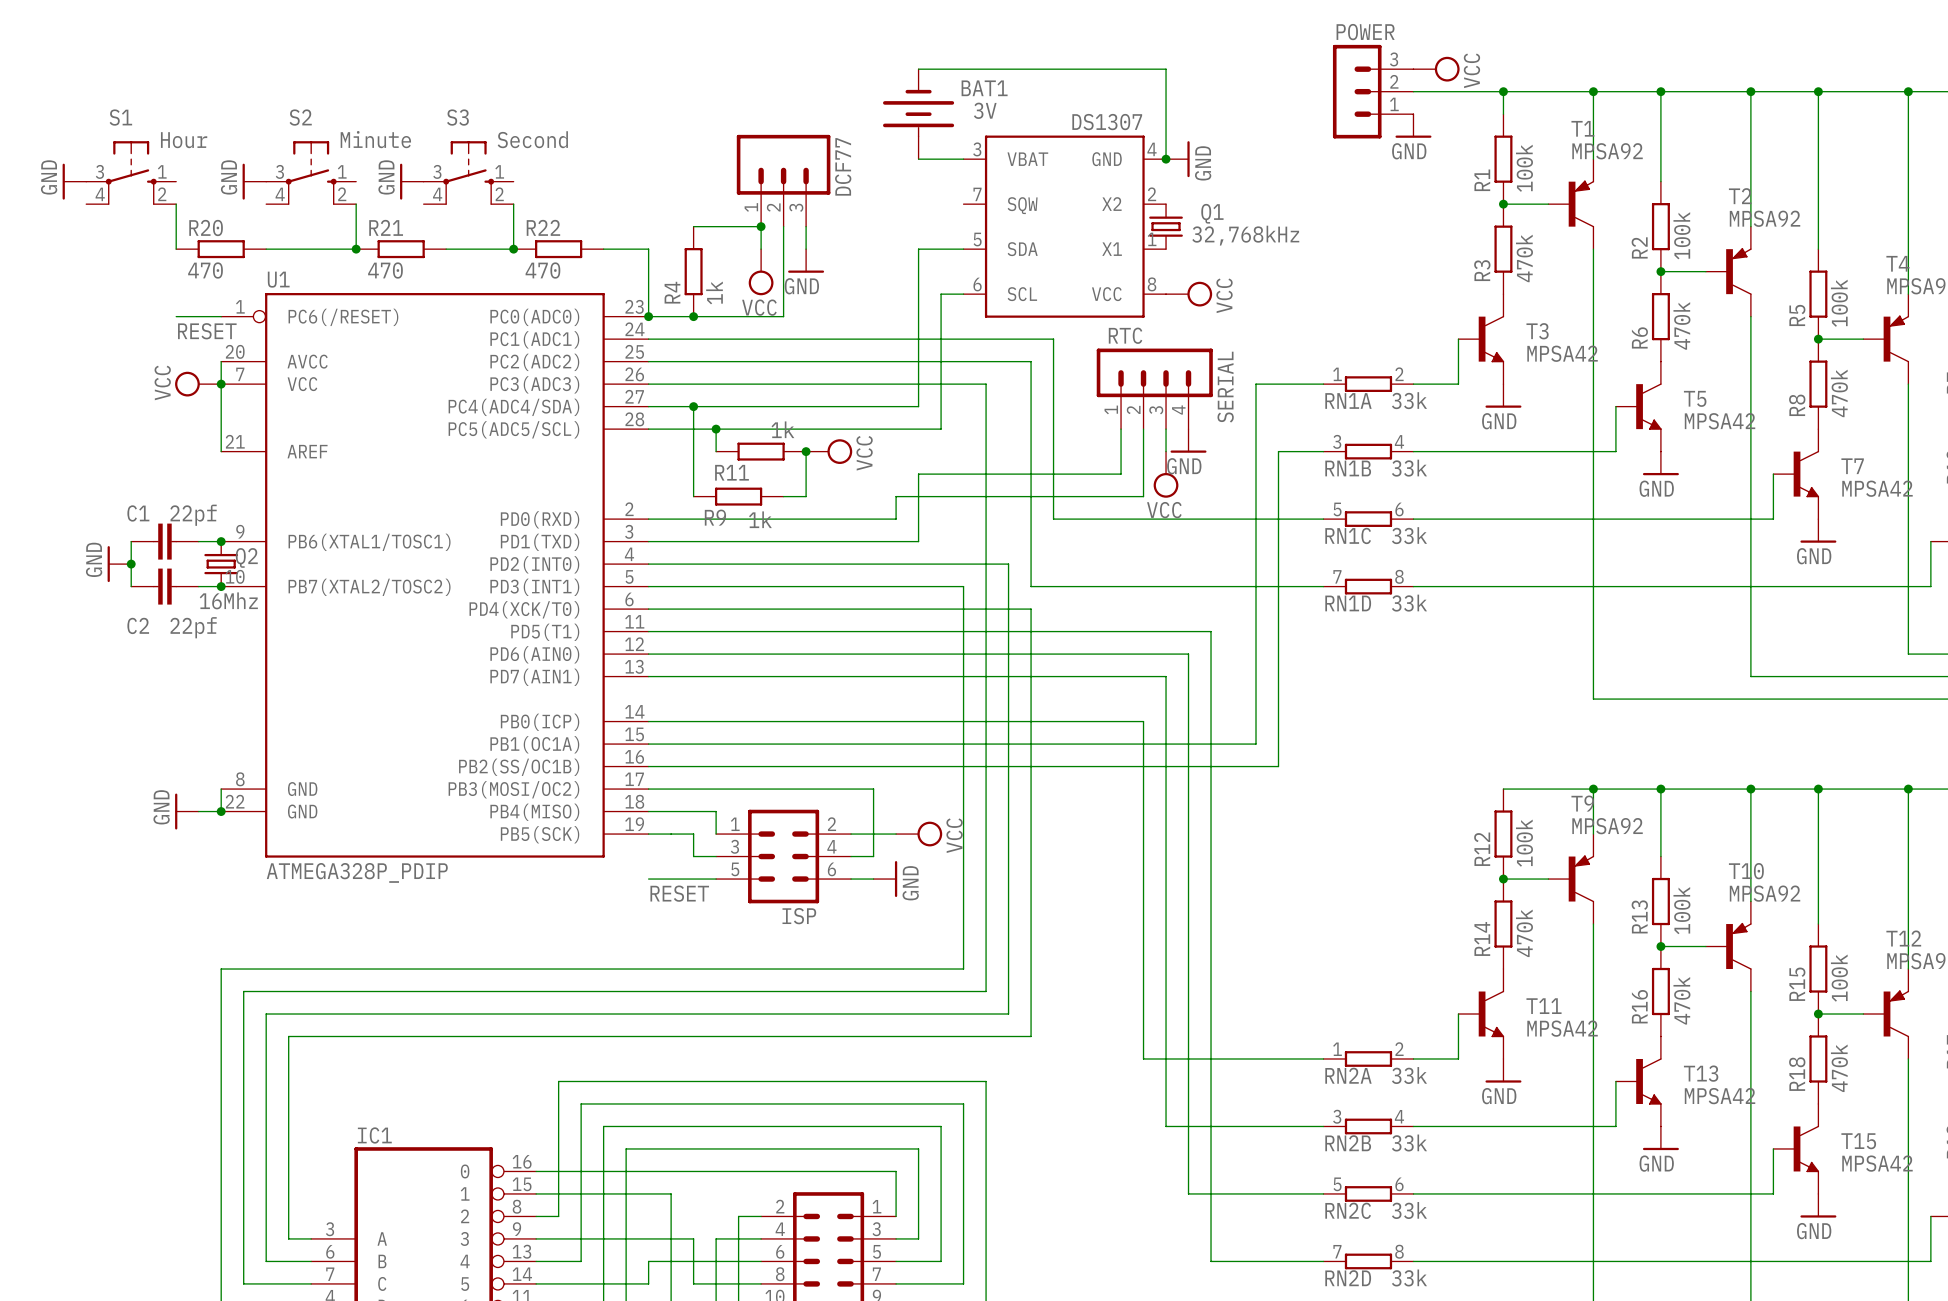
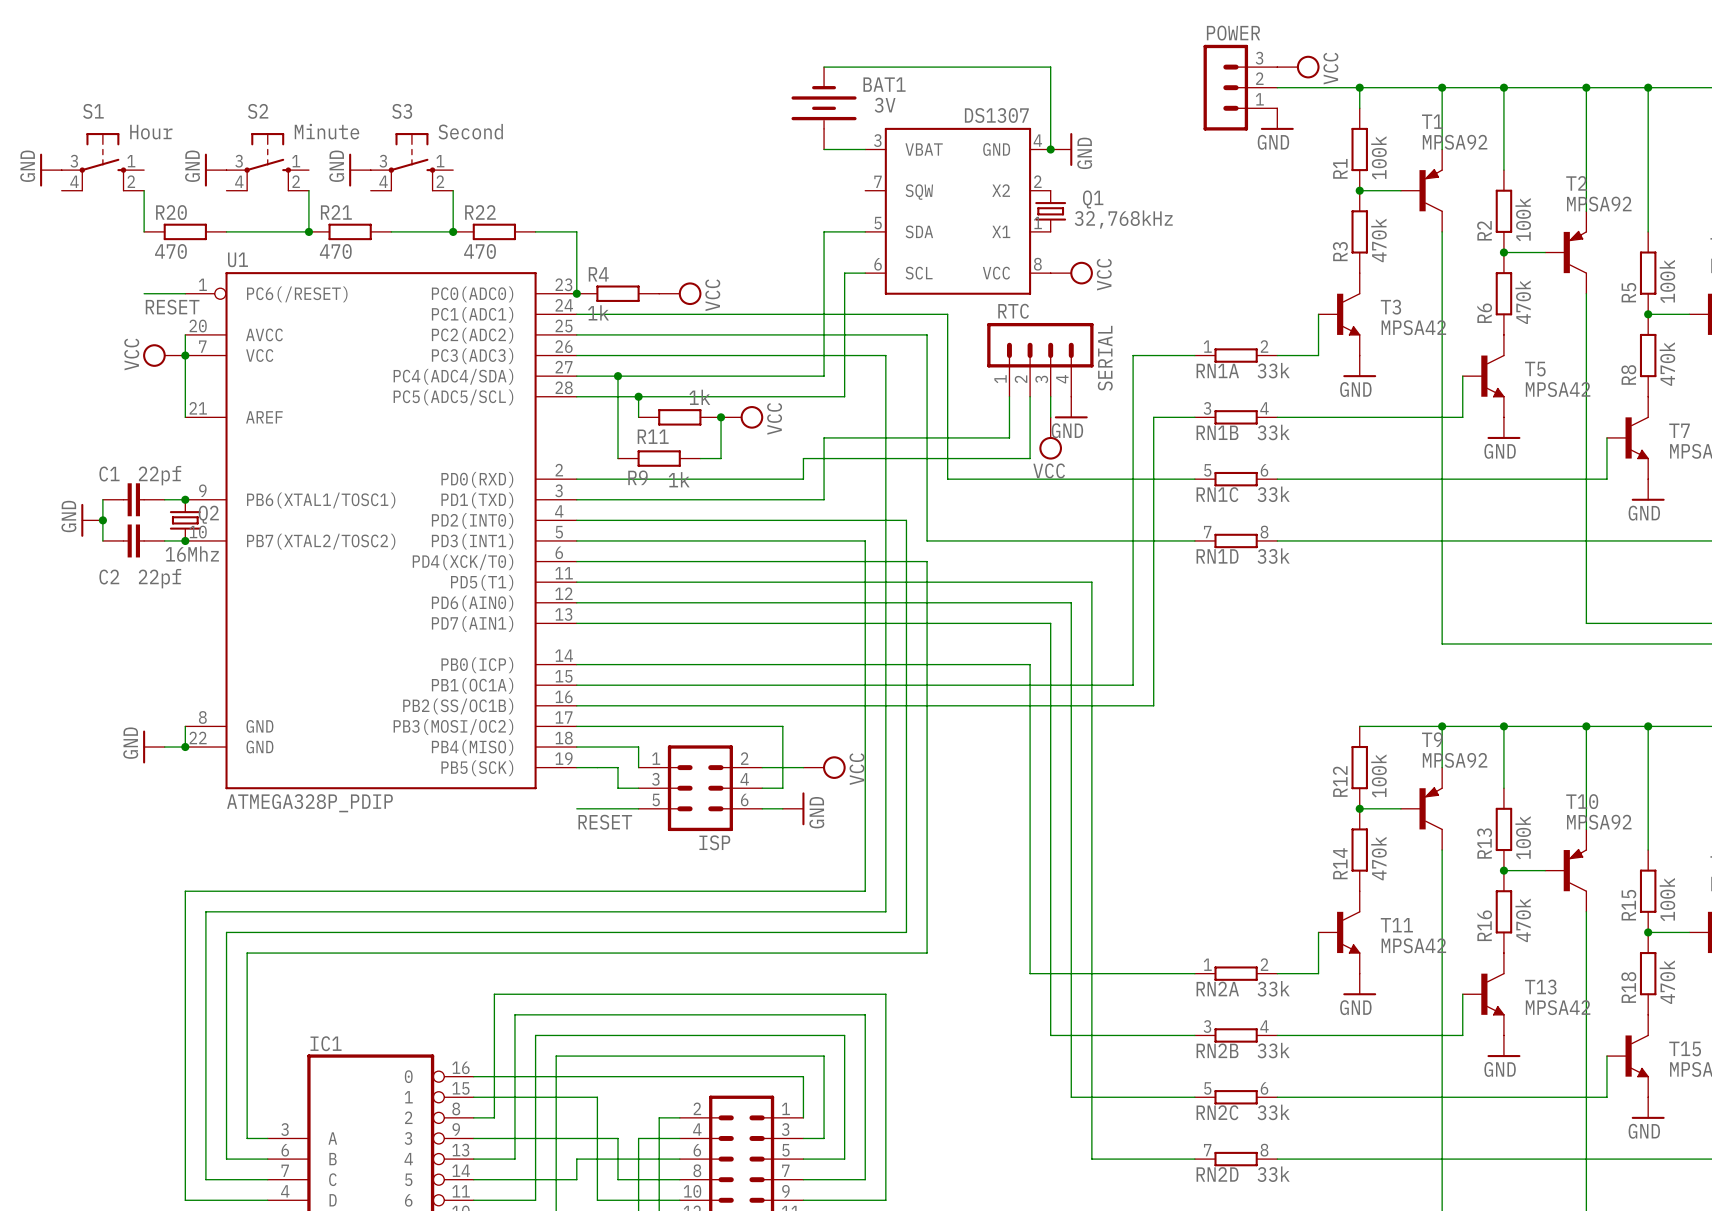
DCF77: (783, 180) -> none
wire: (693, 226) (761, 226) (761, 249) -> none
junction: (761, 226) -> none
wire: (783, 226) (783, 316) (648, 316) -> none
wire: (806, 226) (806, 249) -> none
power symbol: GND (806, 260) -> none
R4 rotation: 0° (693, 271) -> 90° clockwise (618, 293)
power symbol position: VCC (761, 272) -> VCC (680, 293)
power symbol rotation: 0° (761, 282) -> 90° counterclockwise (690, 293)
junction: (693, 316) -> none

